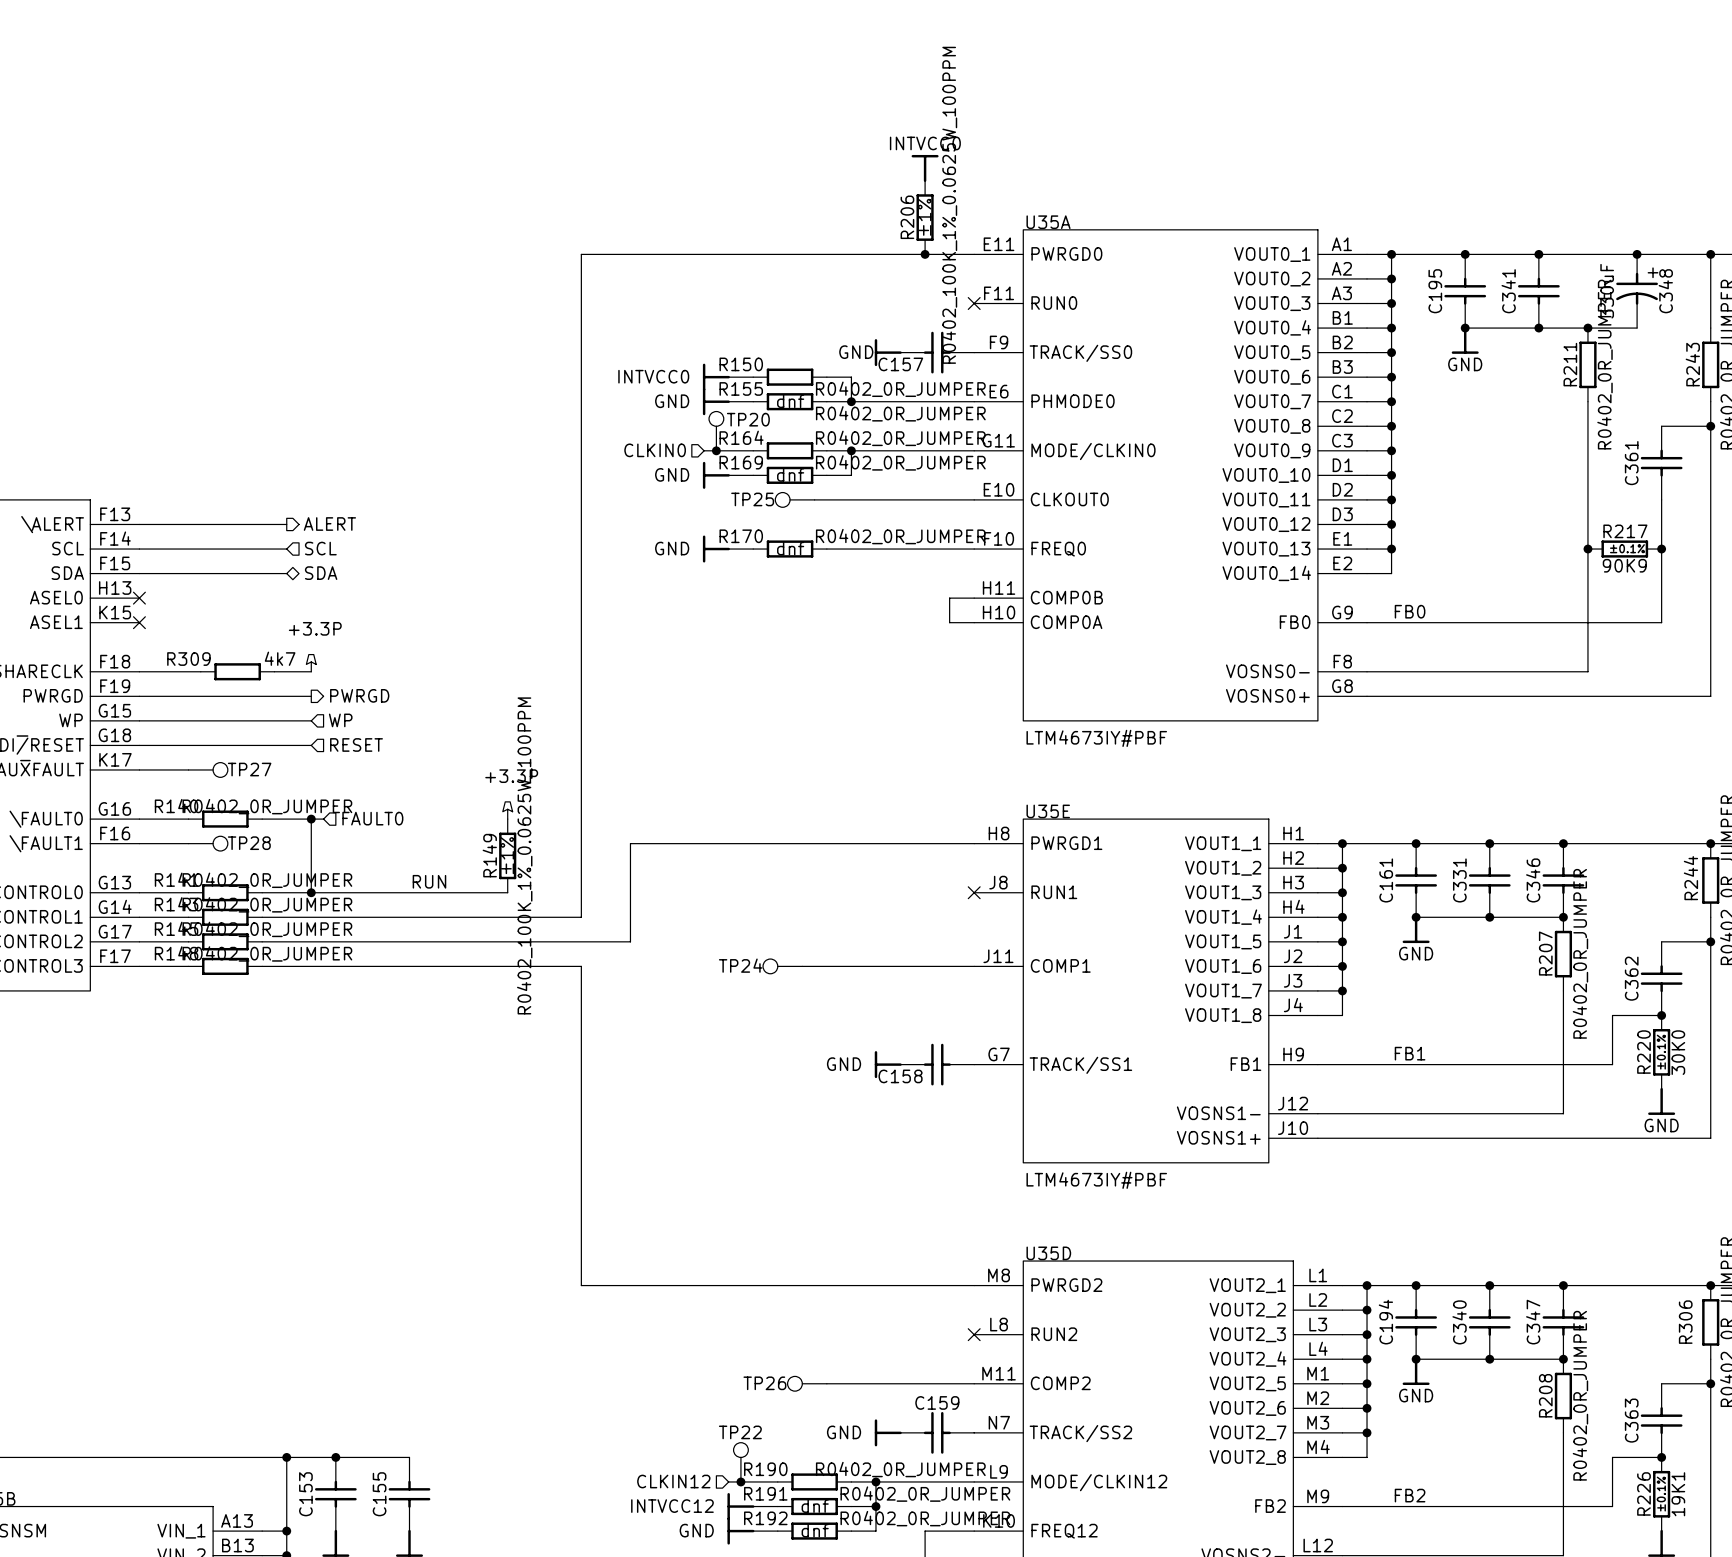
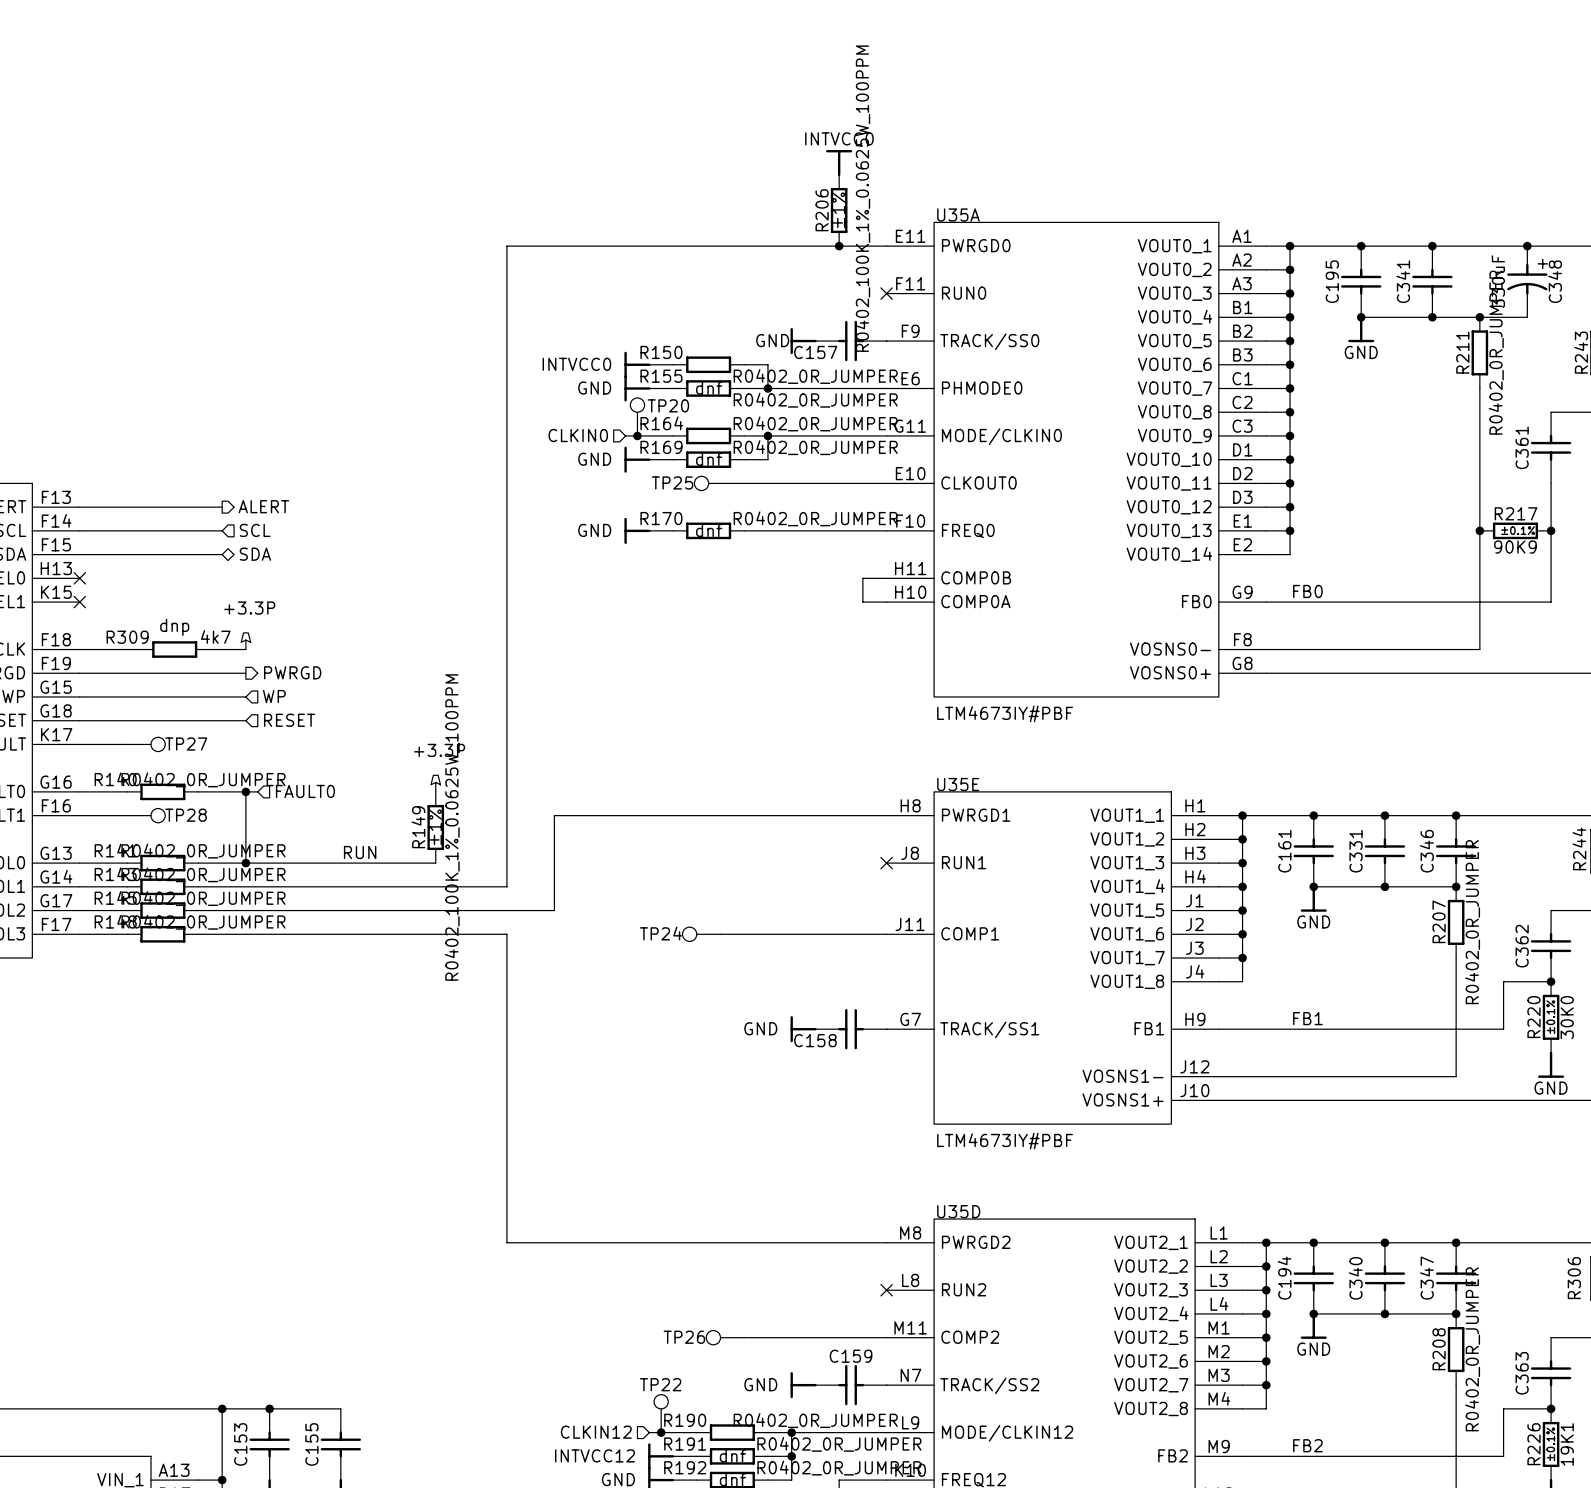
R309 text: none -> dnp (174, 627)

